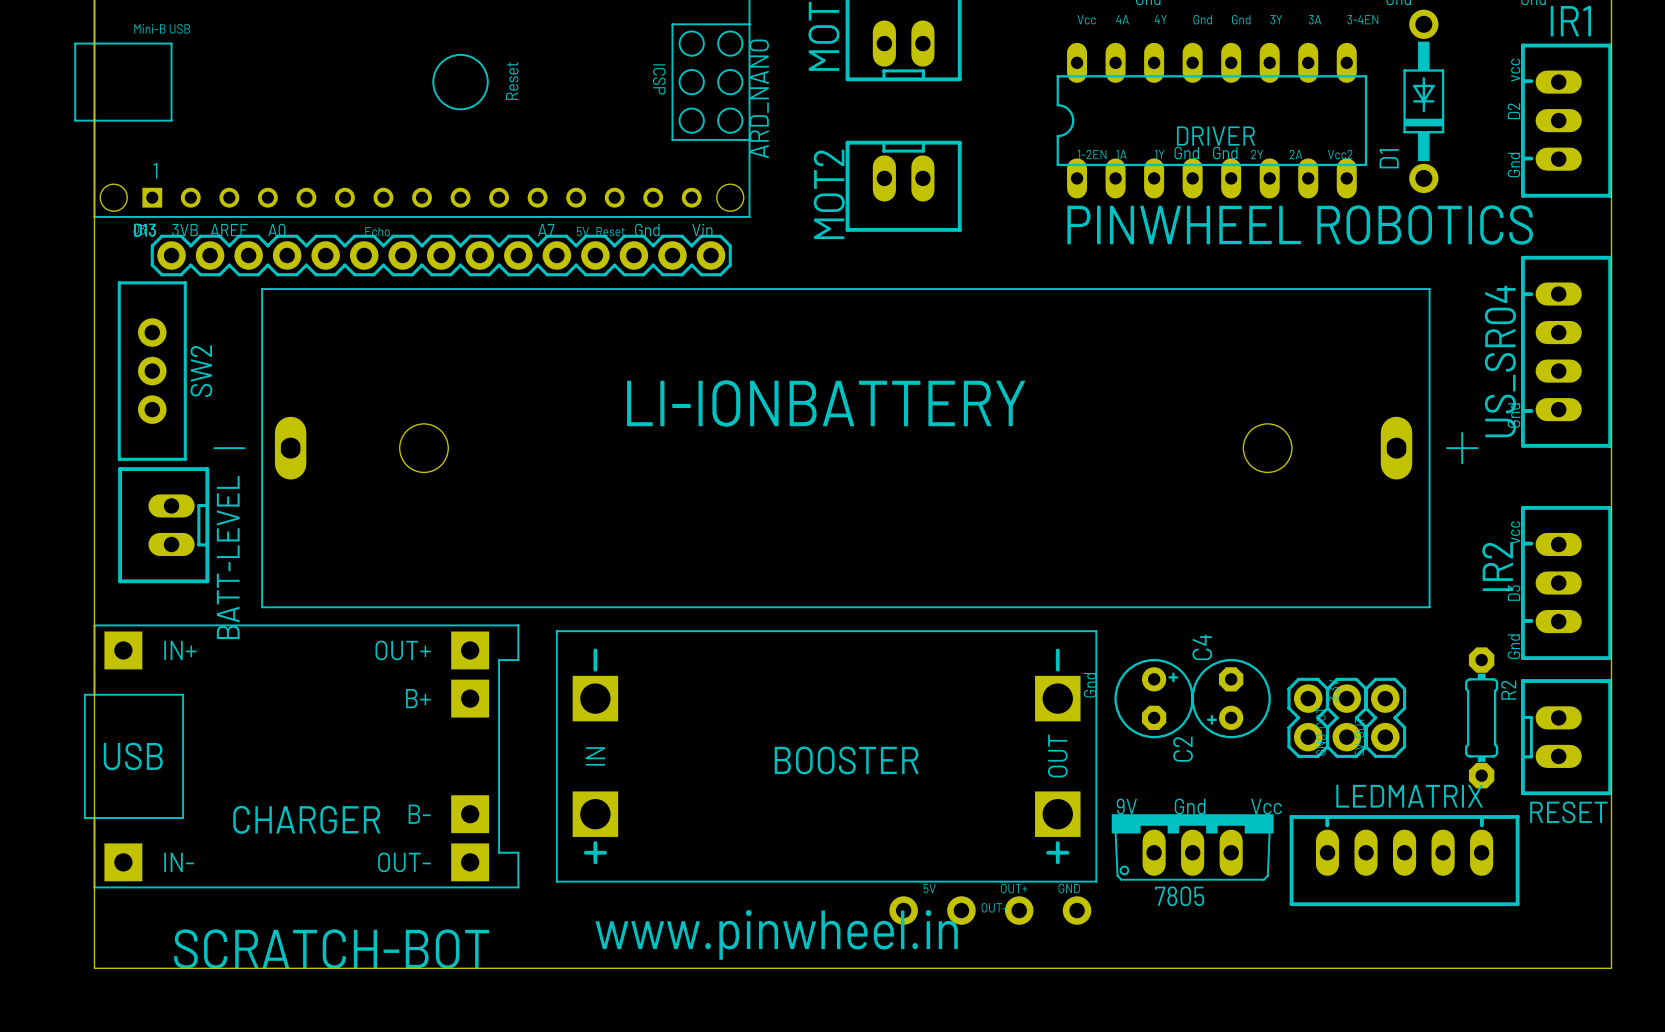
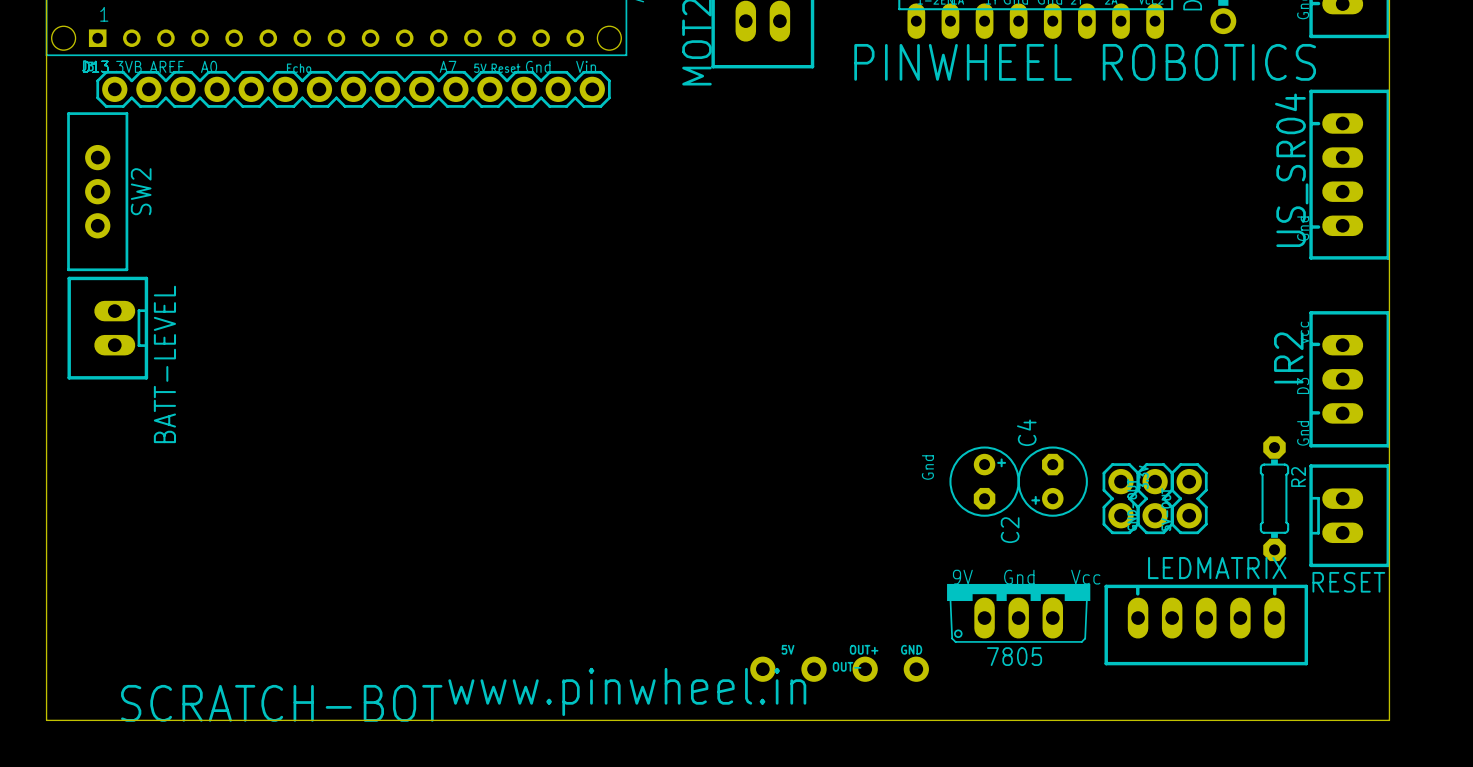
LI-IONBATTERY: (845, 448) -> none
CHARGER: (301, 756) -> none
BOOSTER: (826, 756) -> none

